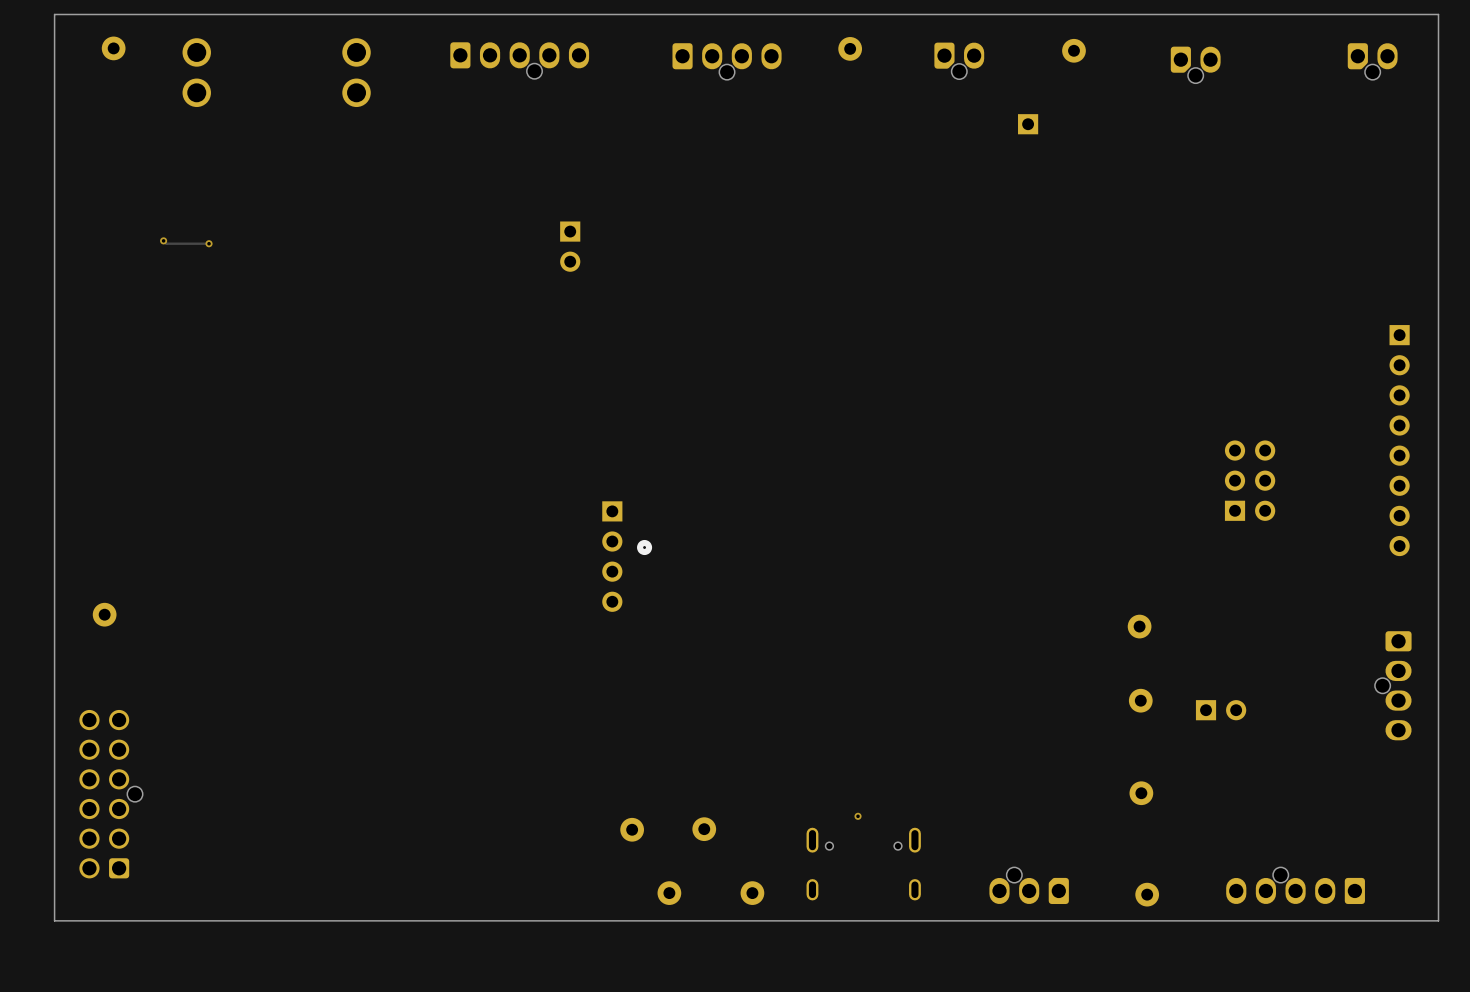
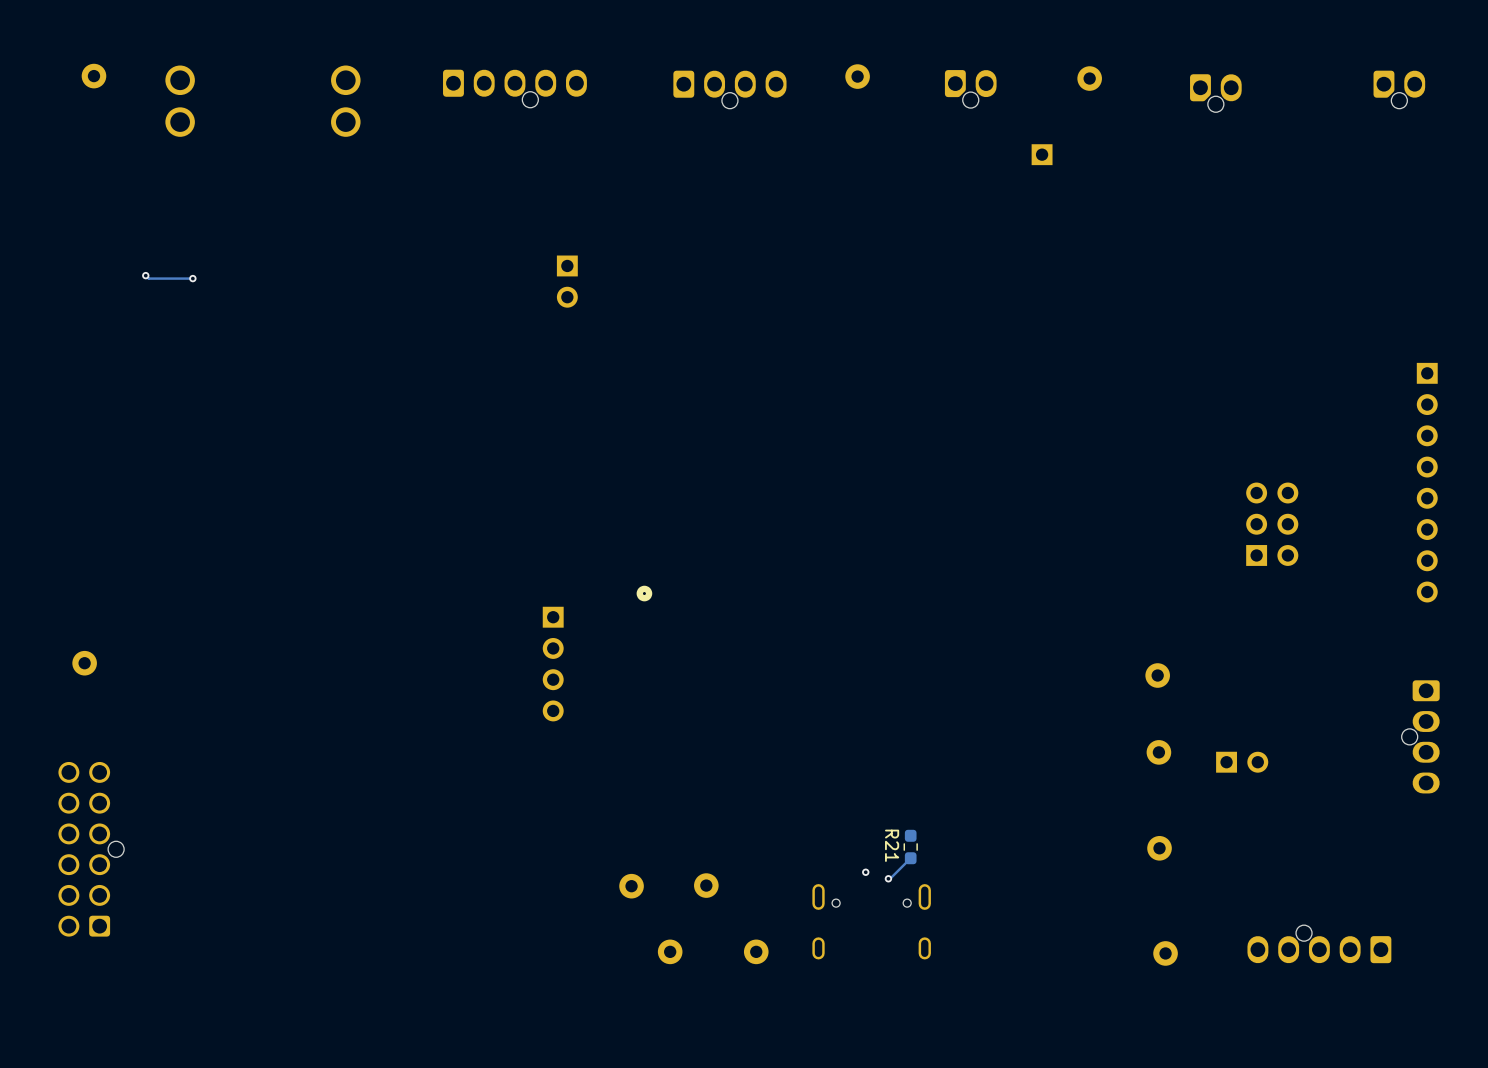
board edge: (1438, 14) (54, 14) (54, 920) (1438, 920) (1438, 14) -> none
part position: (612, 556) -> (553, 664)
R21: none -> (910, 847)
track: none -> (910, 858) (888, 878)
via: none -> (888, 878)
part: (1029, 885) -> none

